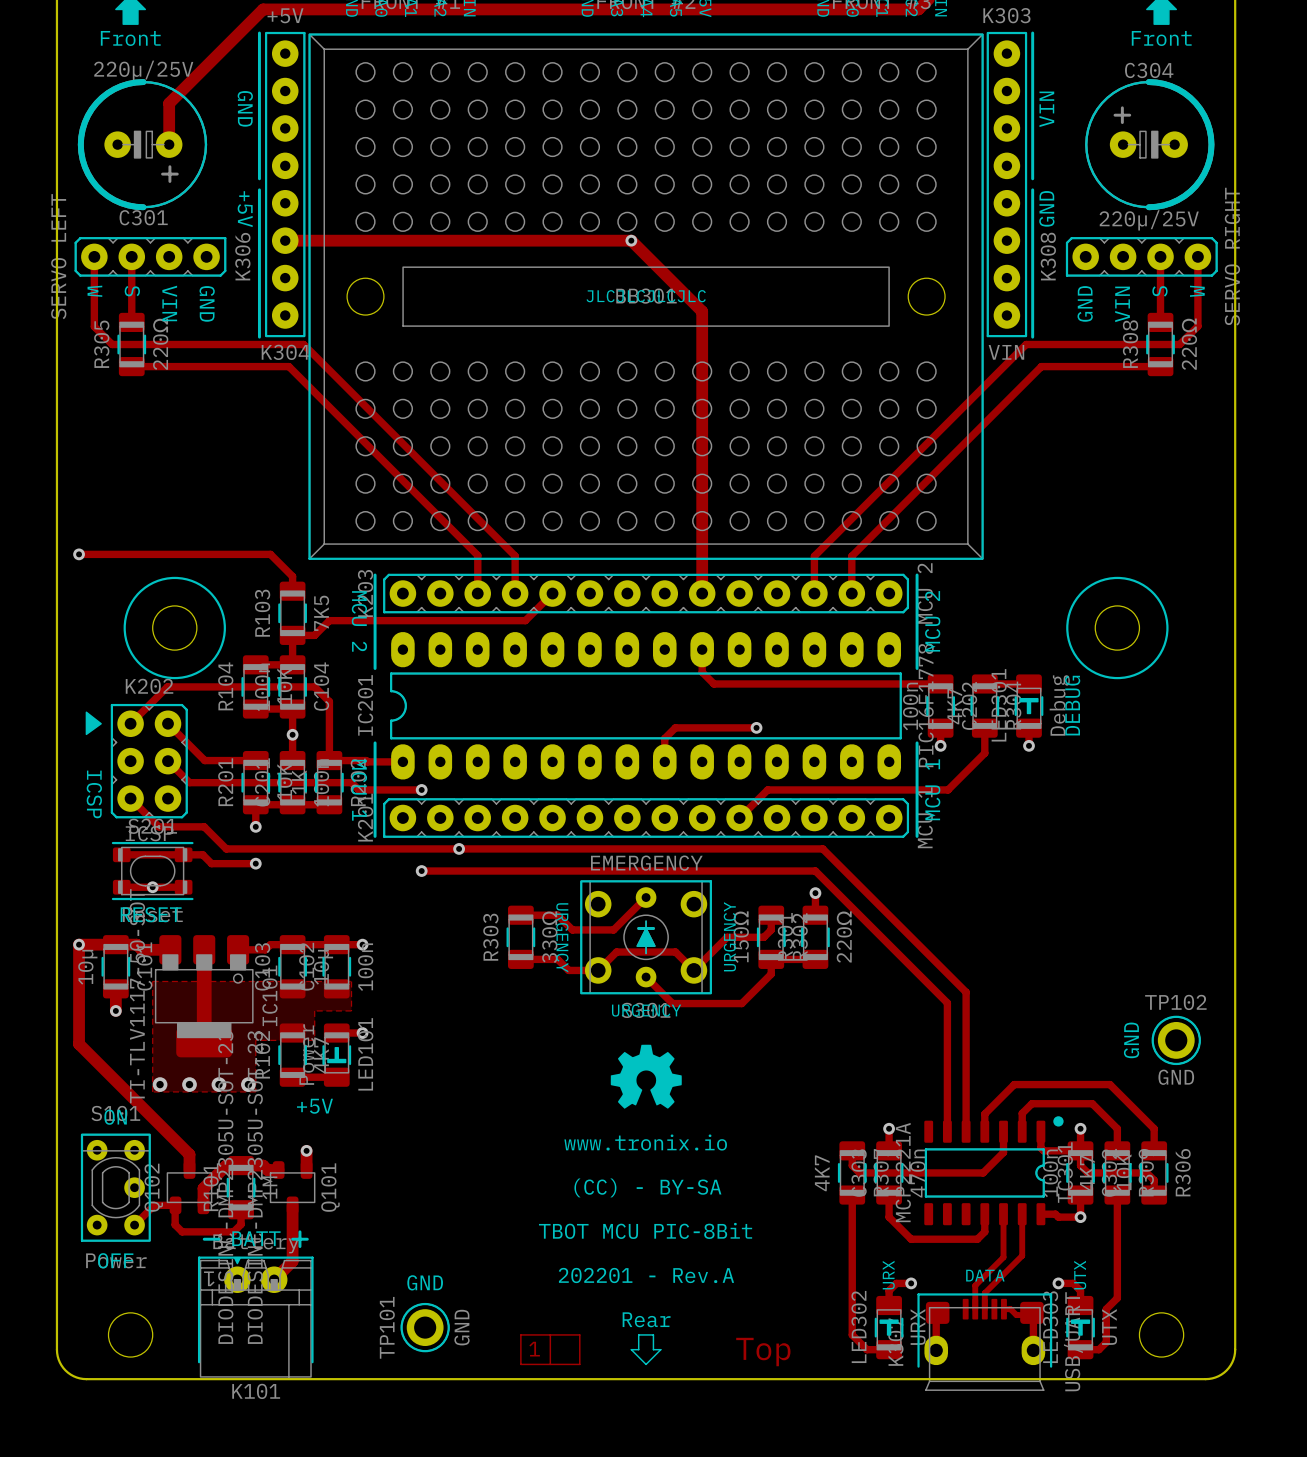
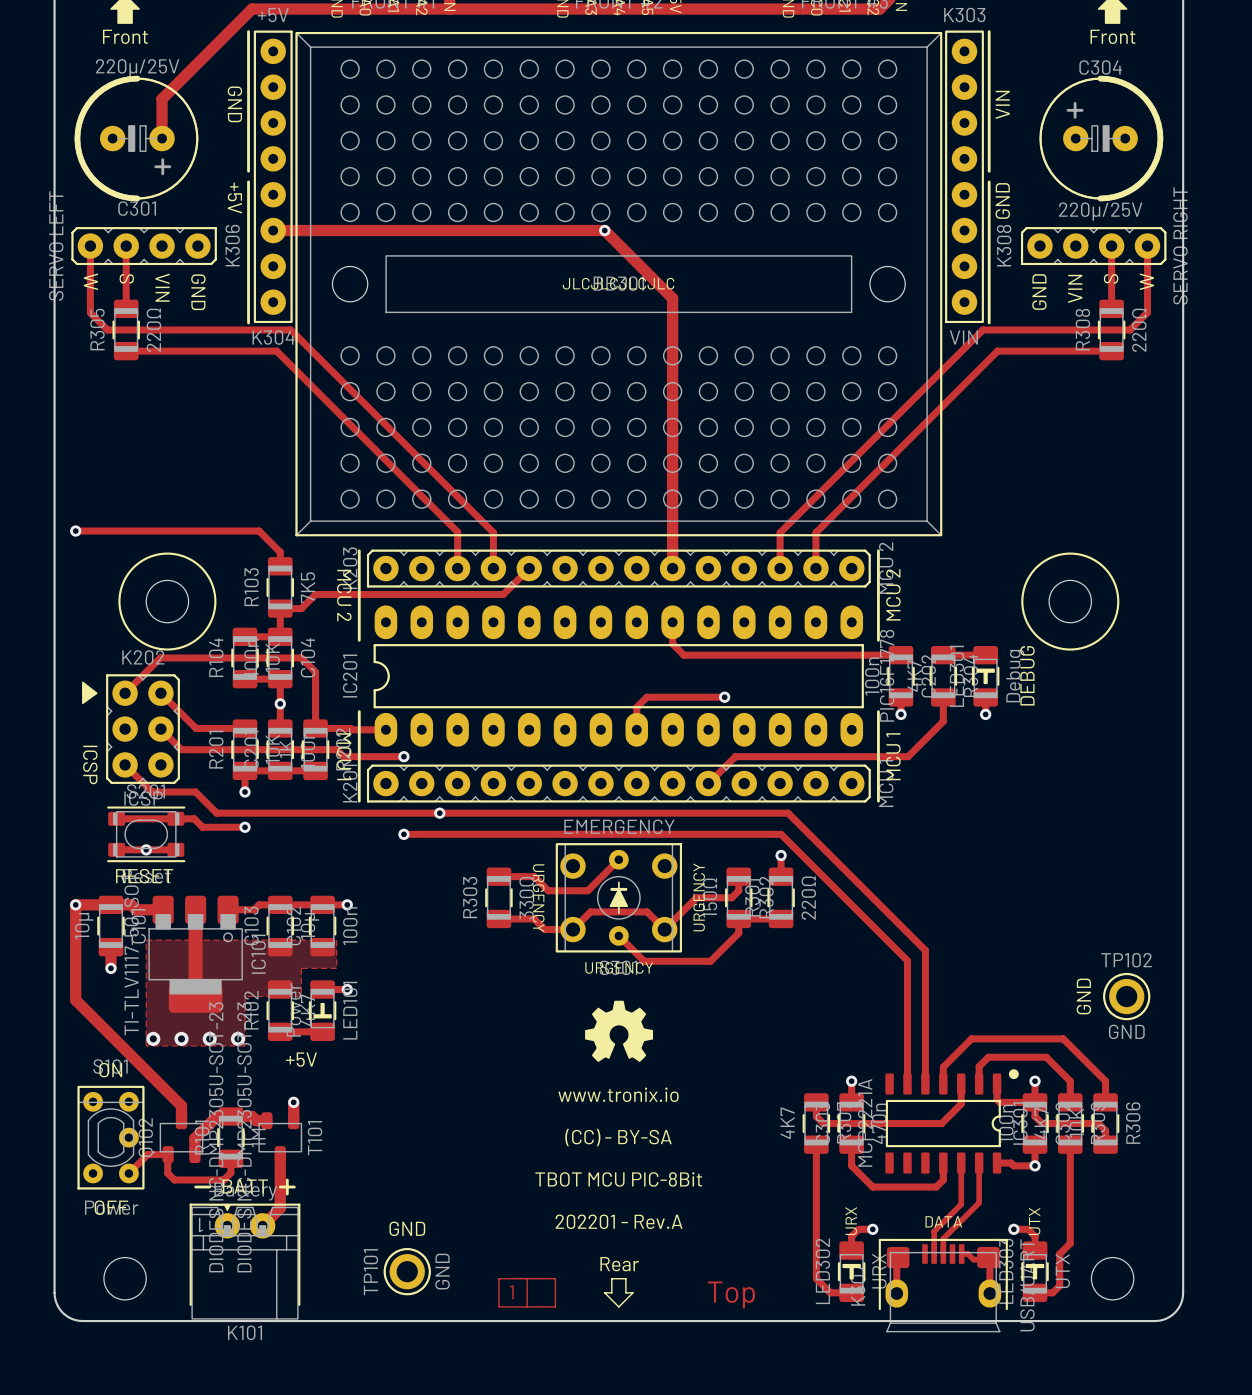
Q101 name: Q101 (330, 1187) -> T101 (315, 1138)

